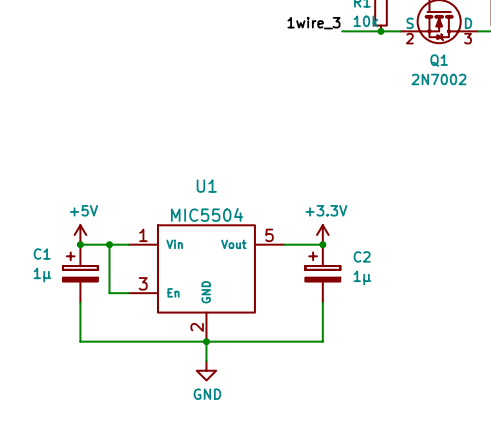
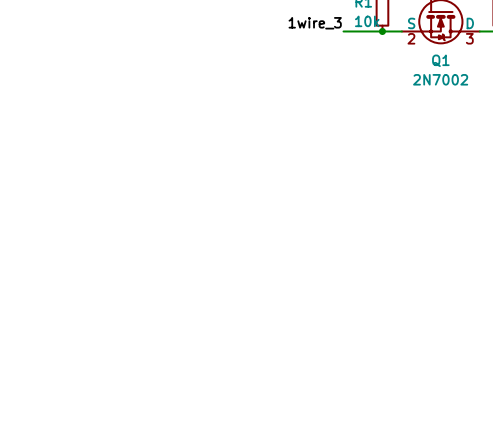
power symbol: +5V (80, 234) -> none
power symbol: +3.3V (322, 234) -> none
wire: (80, 244) (128, 244) -> none
junction: (80, 244) -> none
wire: (109, 244) (109, 293) (128, 293) -> none
junction: (109, 244) -> none
wire: (284, 244) (322, 244) -> none
junction: (322, 244) -> none
C1: 1µ (80, 273) -> none
C2: 1µ (322, 273) -> none
U1: MIC5504 (206, 283) -> none
wire: (80, 302) (80, 341) (322, 341) (322, 302) -> none
wire: (206, 341) (206, 361) -> none
junction: (206, 341) -> none
power symbol: GND (206, 370) -> none

